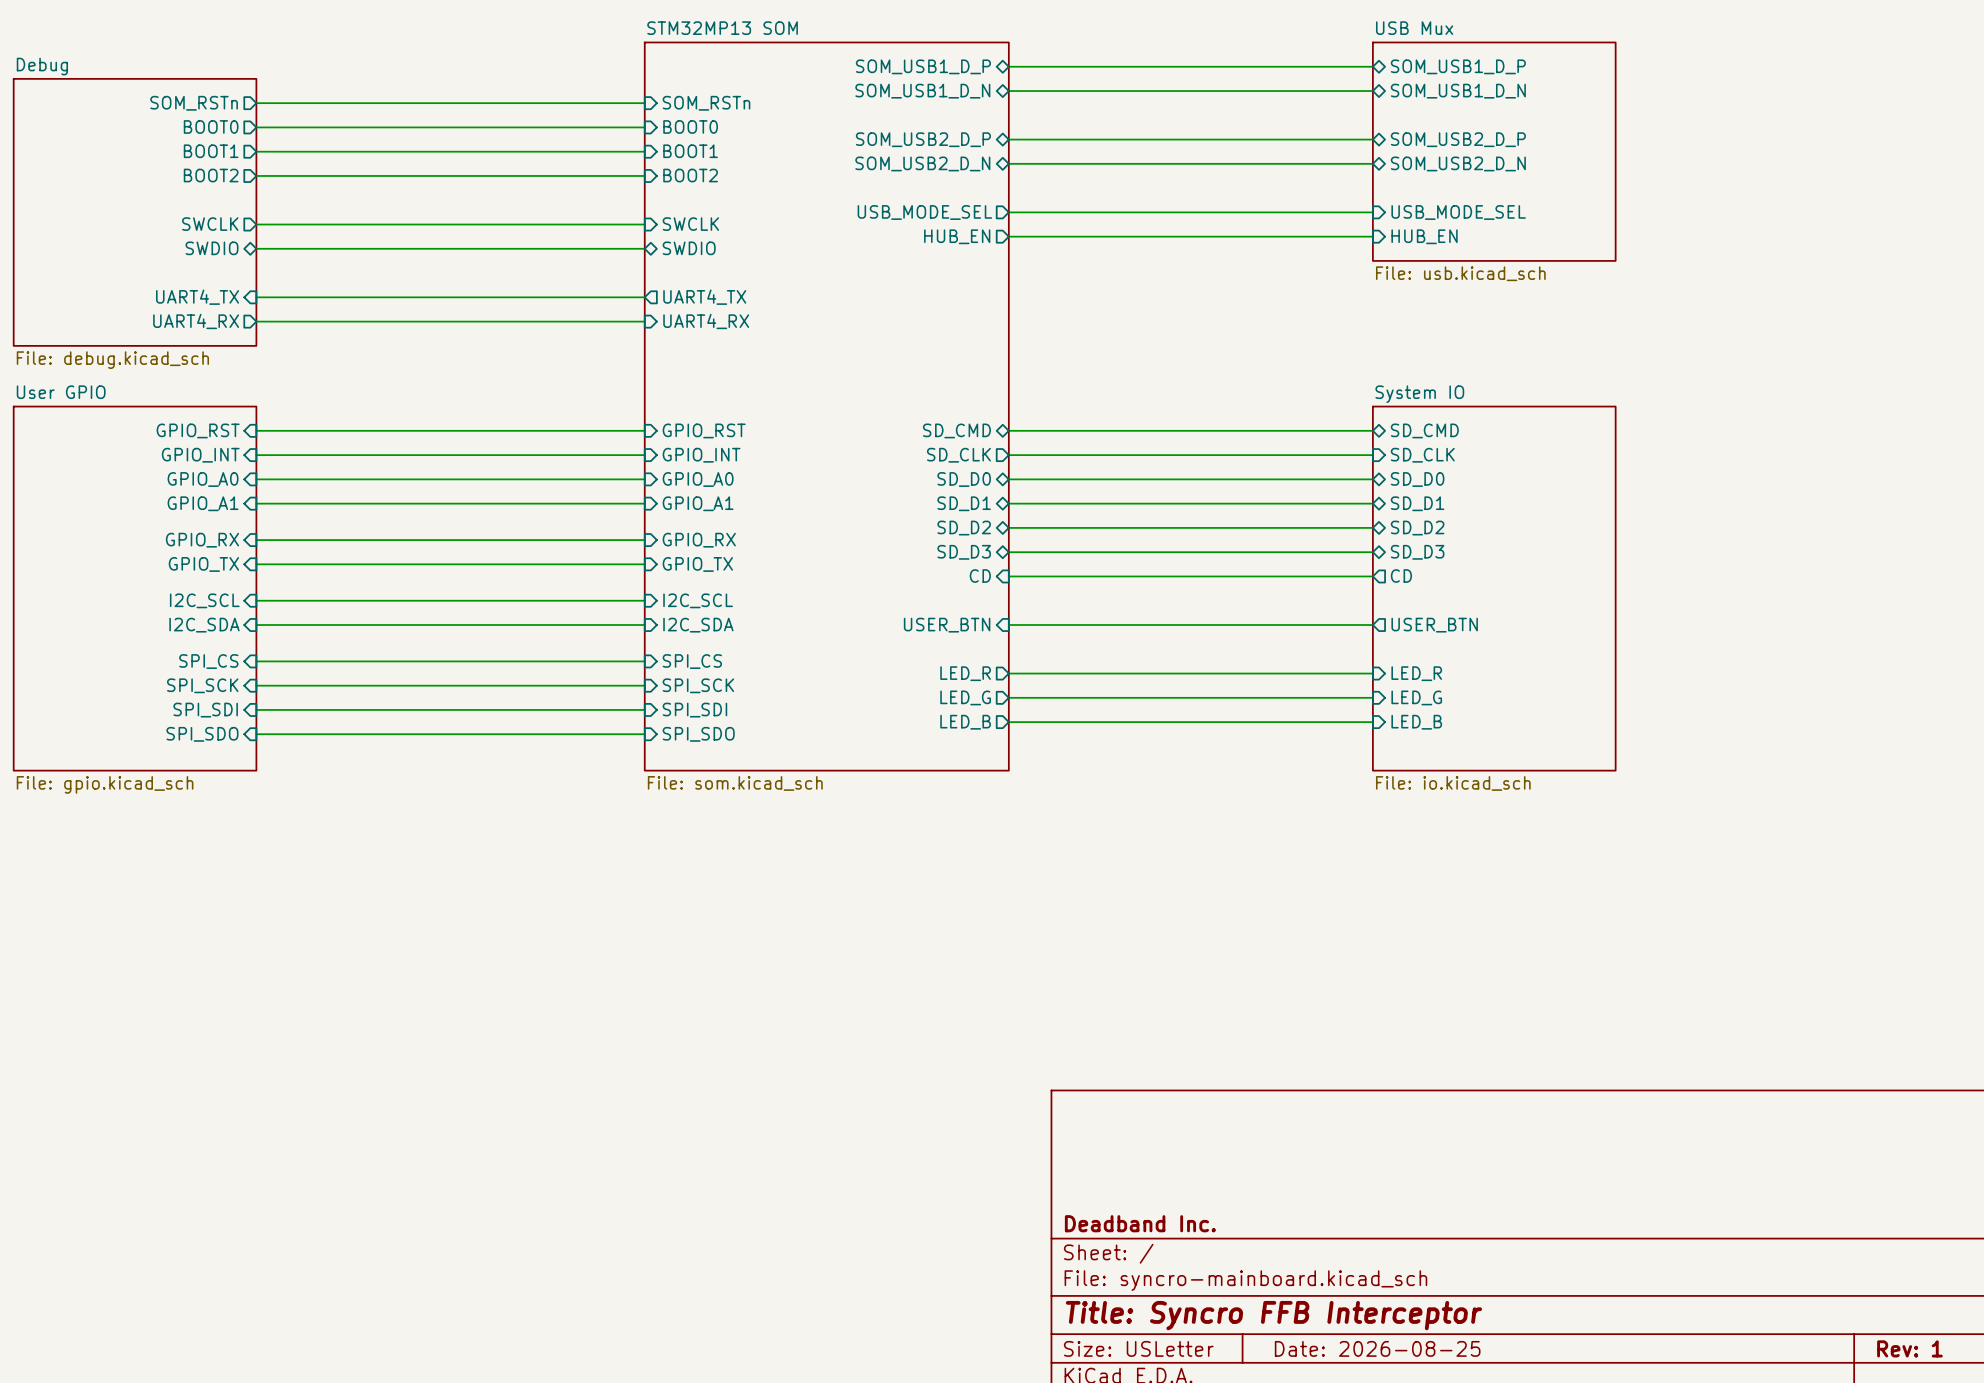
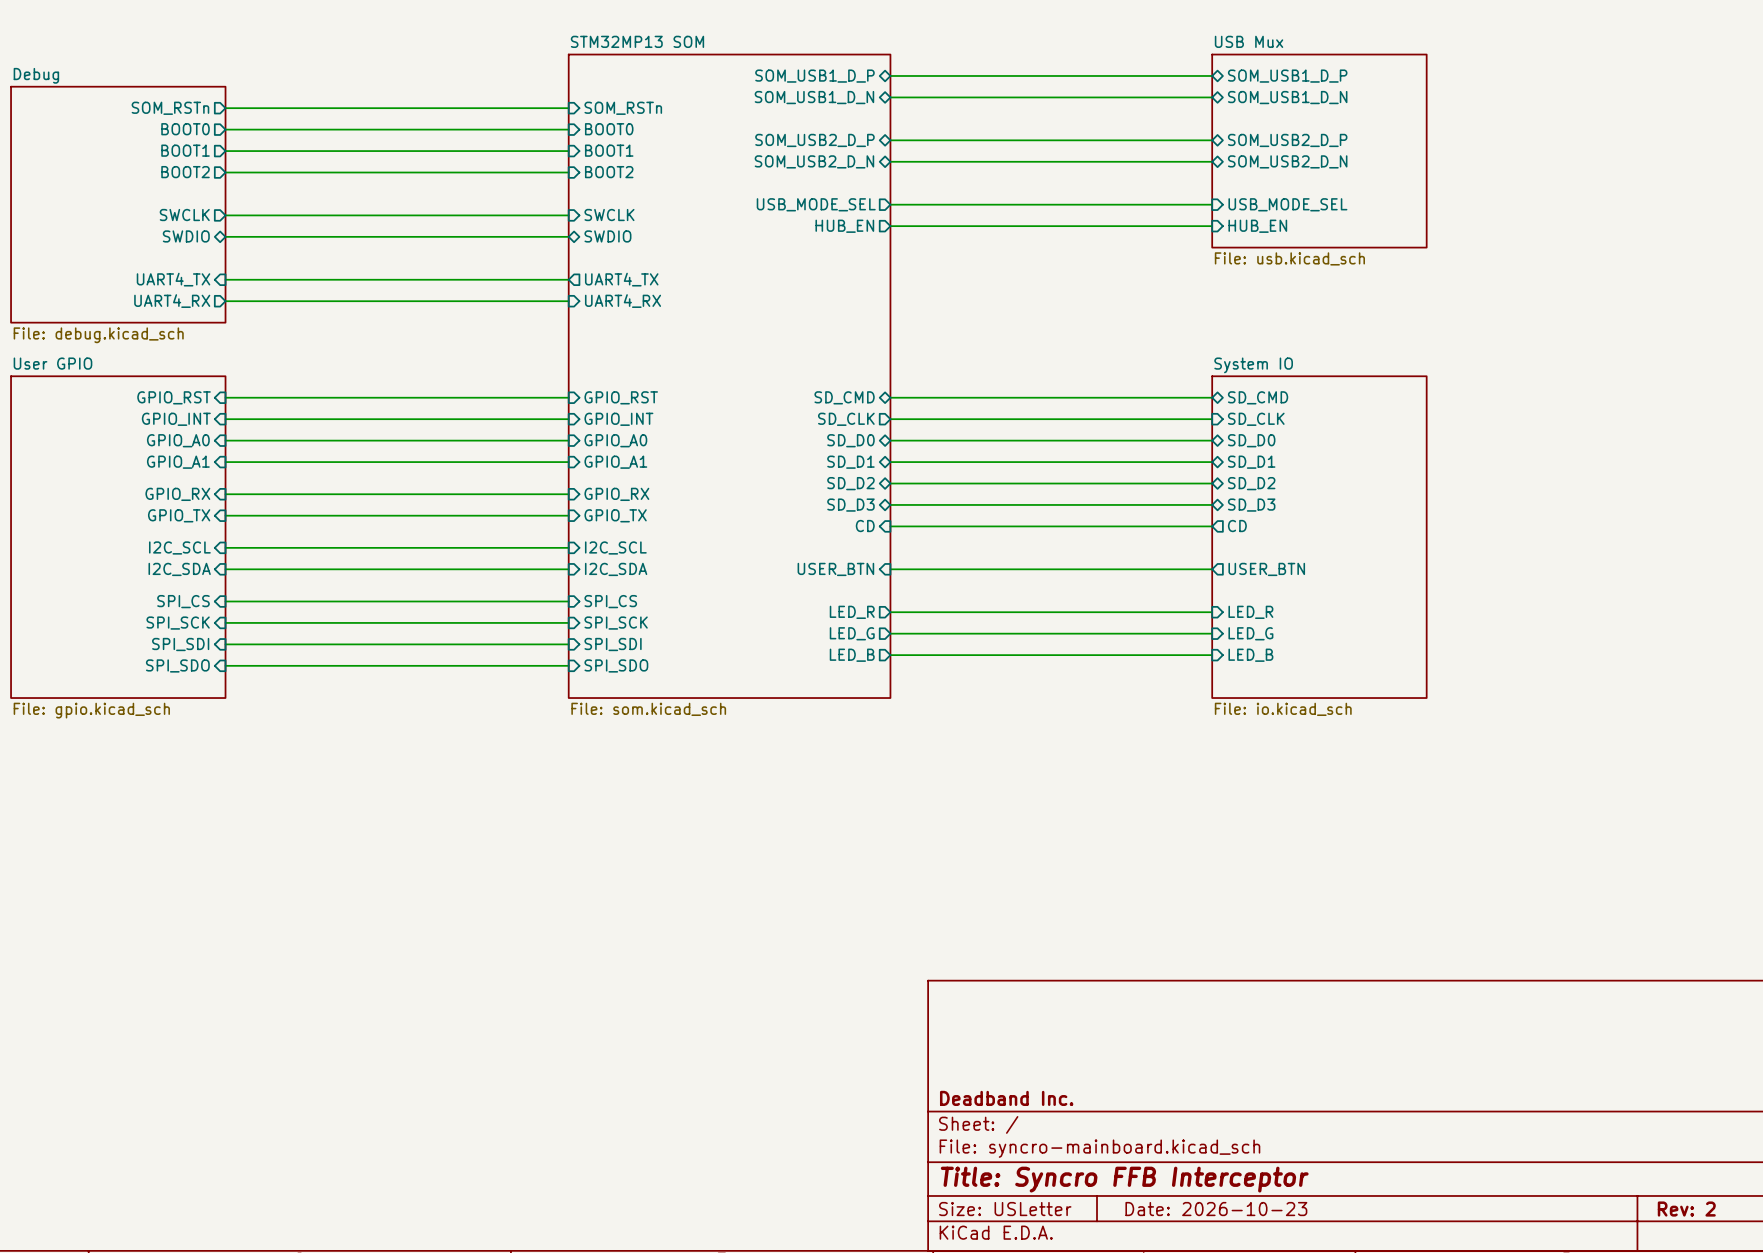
title block: Date: 2026-08-25 (1377, 1348) -> Date: 2026-10-23 (1216, 1209)
title block: Rev: 1 (1909, 1348) -> Rev: 2 (1686, 1209)

